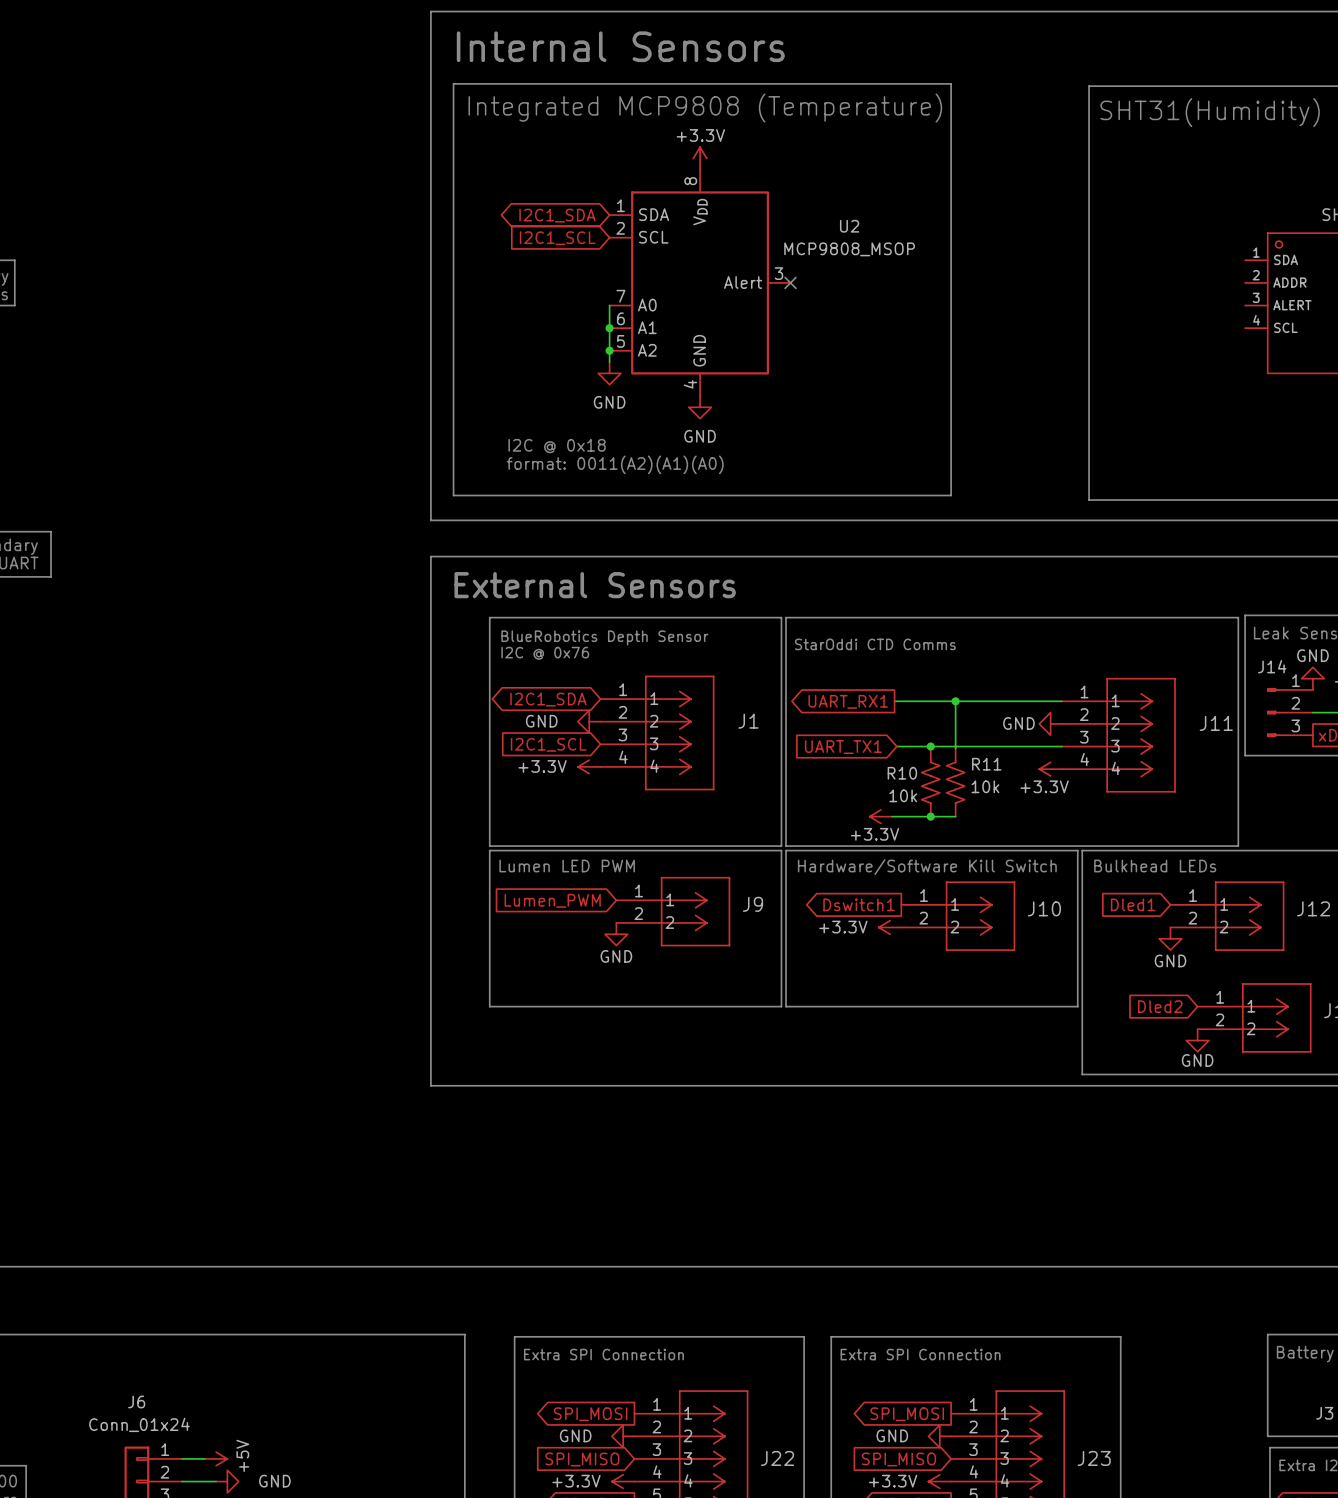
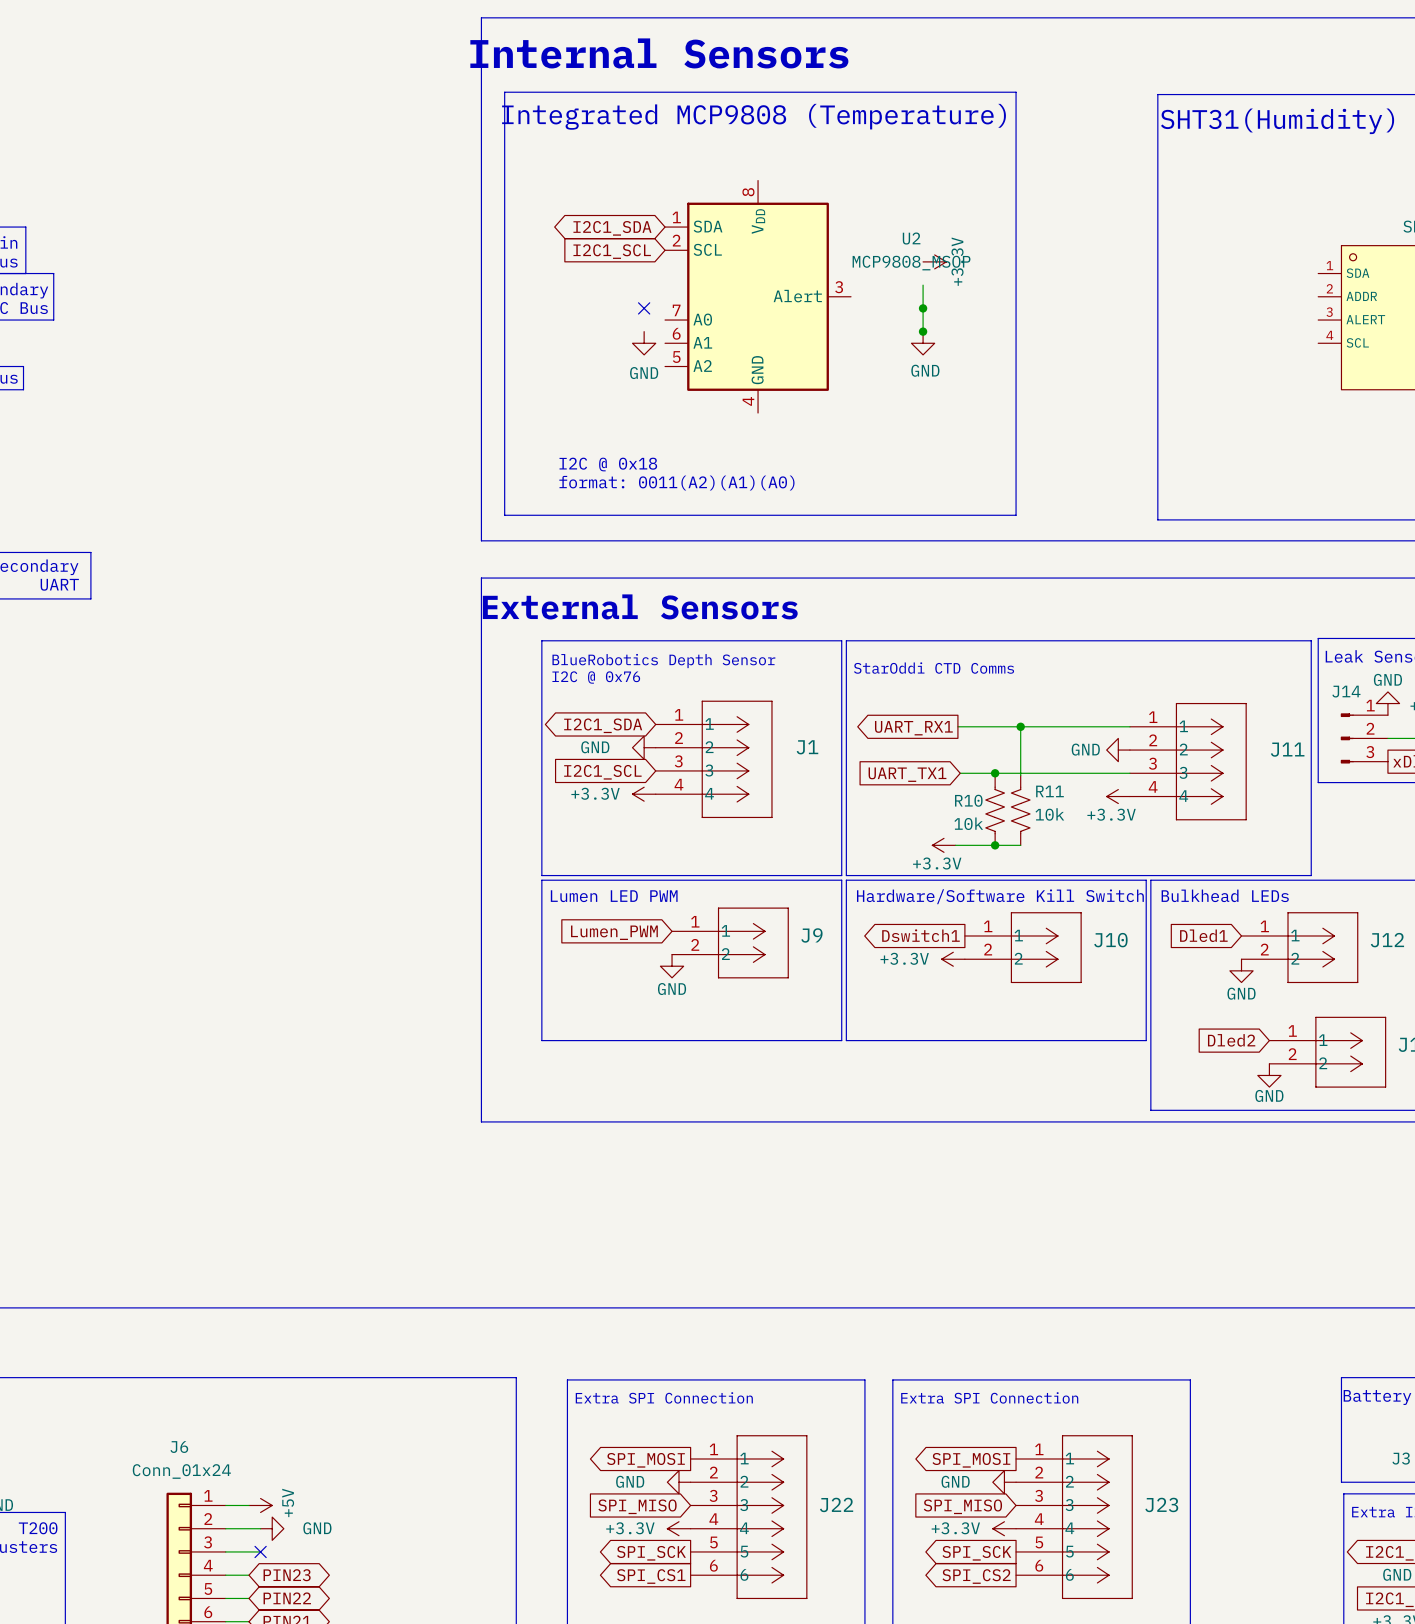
power symbol rotation: 0° (700, 158) -> 90° clockwise (934, 261)
power symbol position: +3.3V (700, 158) -> +3.3V (934, 261)
wire: none -> (923, 285) (923, 331)
no-connect mark: (790, 282) -> none
no-connect mark: none -> (644, 308)
junction: none -> (923, 308)
wire: (609, 305) (609, 362) -> none
junction: none -> (923, 331)
junction: (609, 328) -> none
power symbol: none -> GND (923, 343)
junction: (609, 350) -> none
power symbol position: GND (609, 373) -> GND (644, 343)
power symbol: GND (700, 407) -> none

